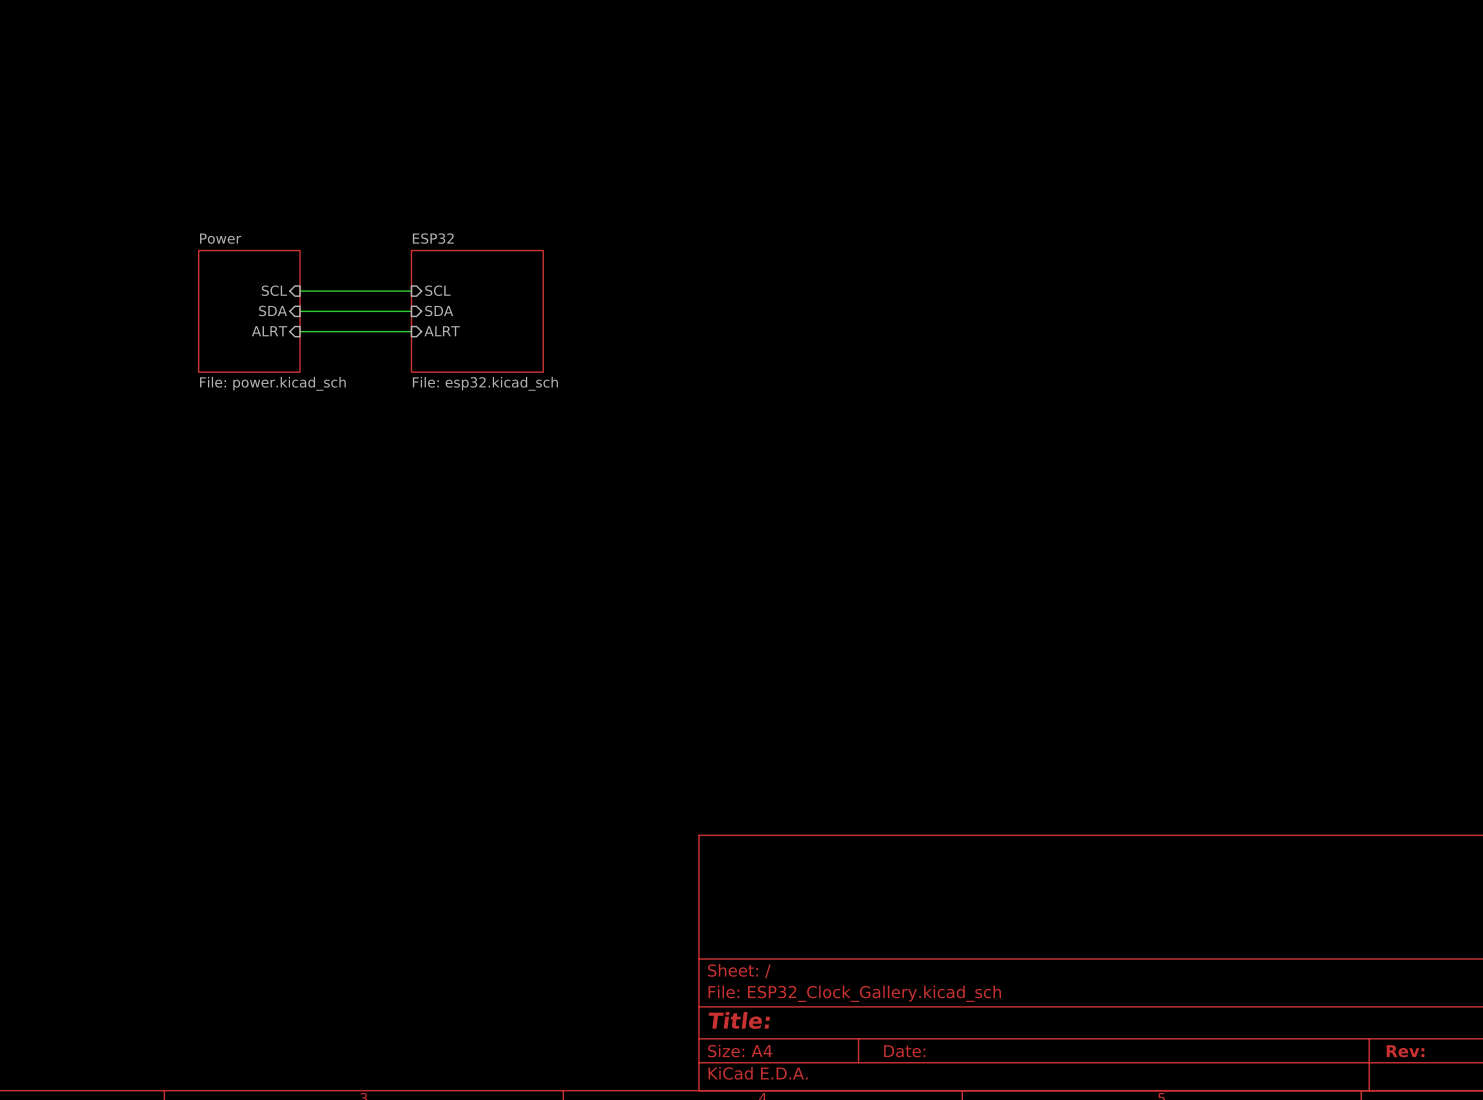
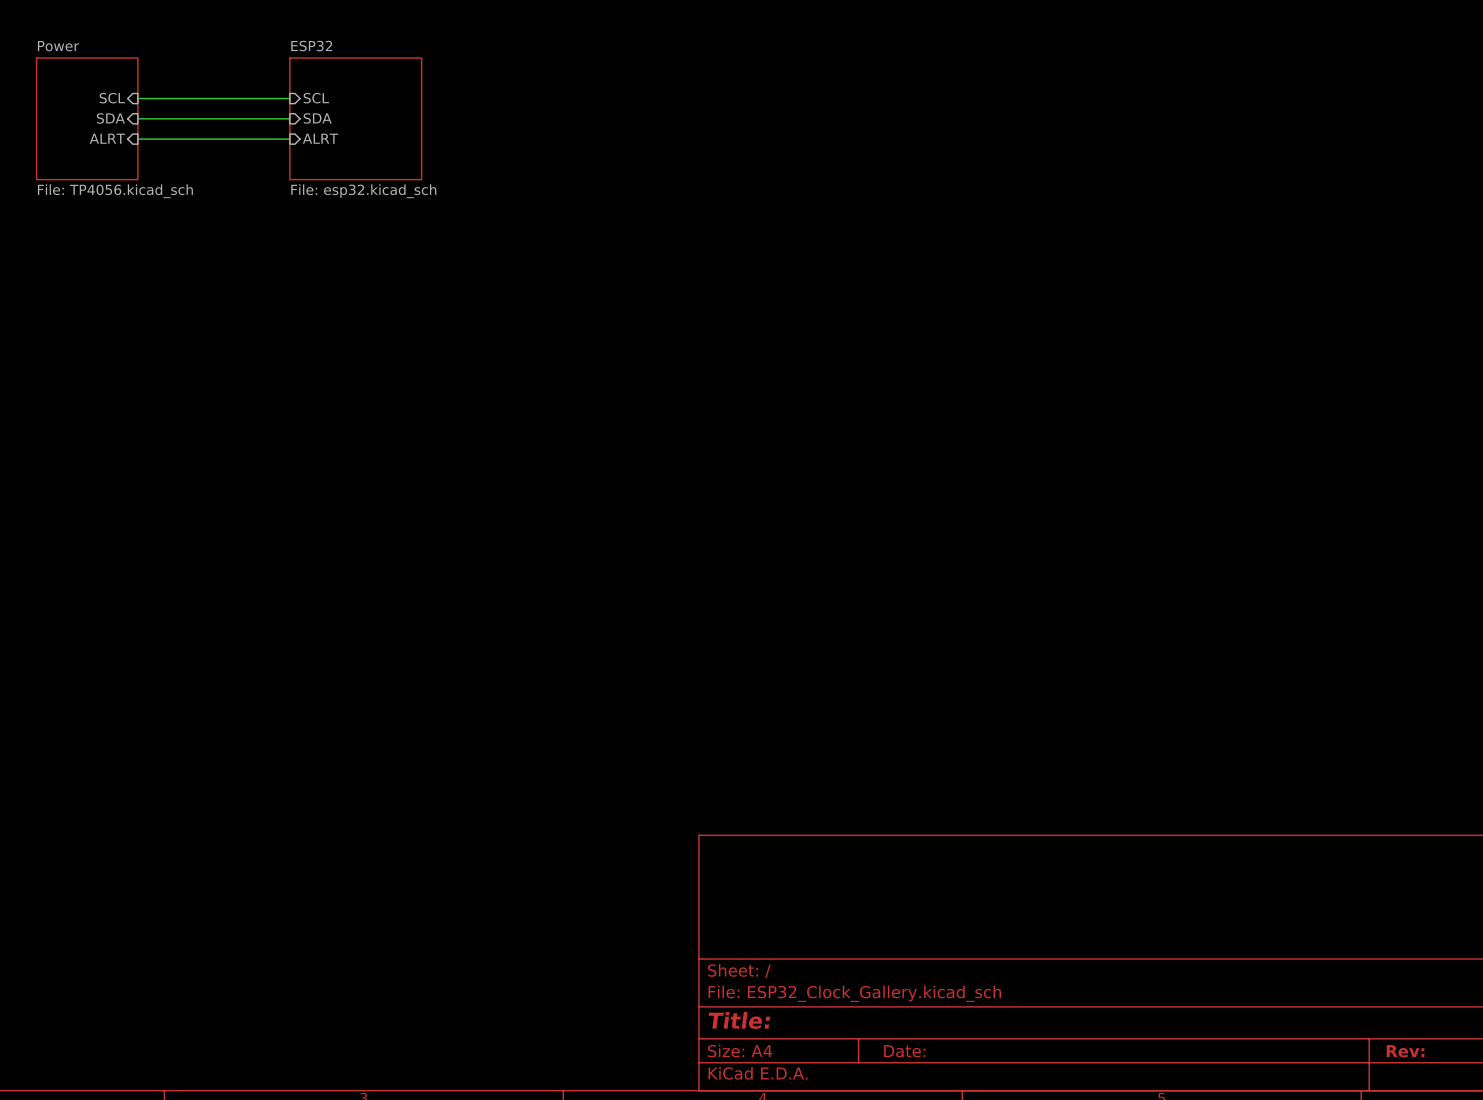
sheet pin: none -> SCL (112, 98)
wire: none -> (137, 98) (289, 98)
sheet pin: none -> SCL (316, 98)
sheet Power: none -> File: TP4056.kicad_sch (87, 118)
sheet pin: none -> SDA (110, 118)
wire: none -> (137, 118) (289, 118)
sheet pin: none -> SDA (317, 118)
sheet pin: none -> ALRT (107, 138)
sheet pin: none -> ALRT (320, 138)
wire: none -> (137, 139) (289, 139)
sheet pin: SCL (274, 290) -> none
sheet pin: SCL (437, 290) -> none
wire: (300, 291) (411, 291) -> none
sheet pin: SDA (273, 310) -> none
sheet pin: SDA (439, 310) -> none
sheet Power: File: power.kicad_sch (249, 311) -> none
wire: (300, 311) (411, 311) -> none
sheet ESP32 position: (477, 311) -> (355, 118)
sheet pin: ALRT (269, 331) -> none
wire: (300, 331) (411, 331) -> none
sheet pin: ALRT (442, 331) -> none

